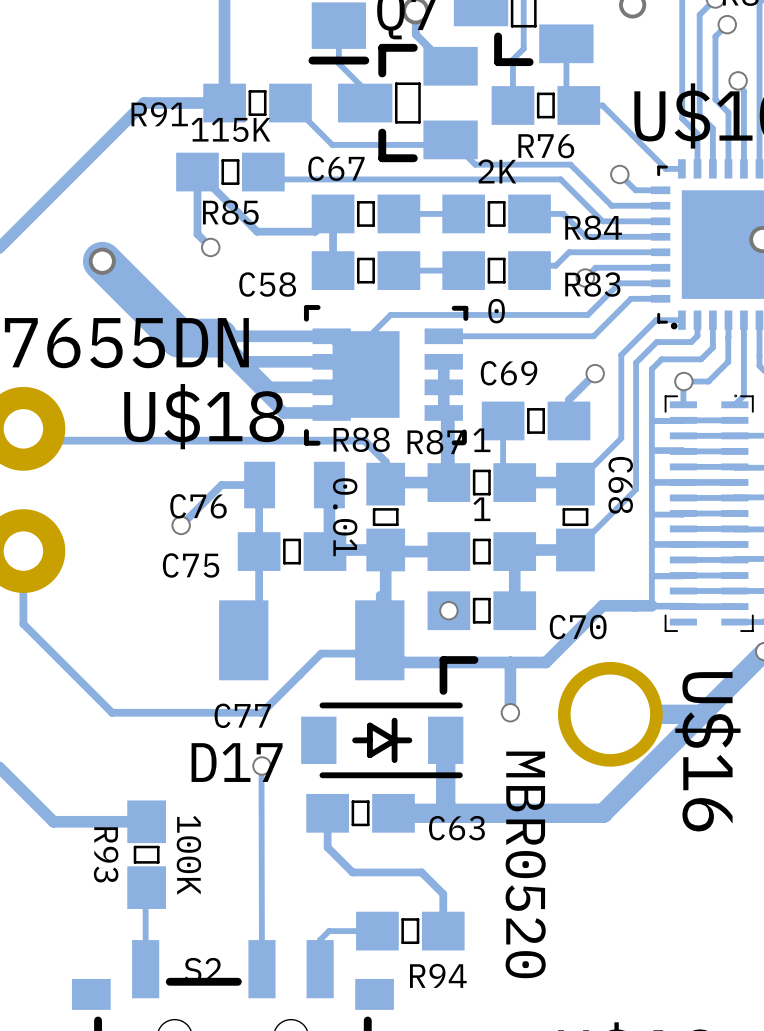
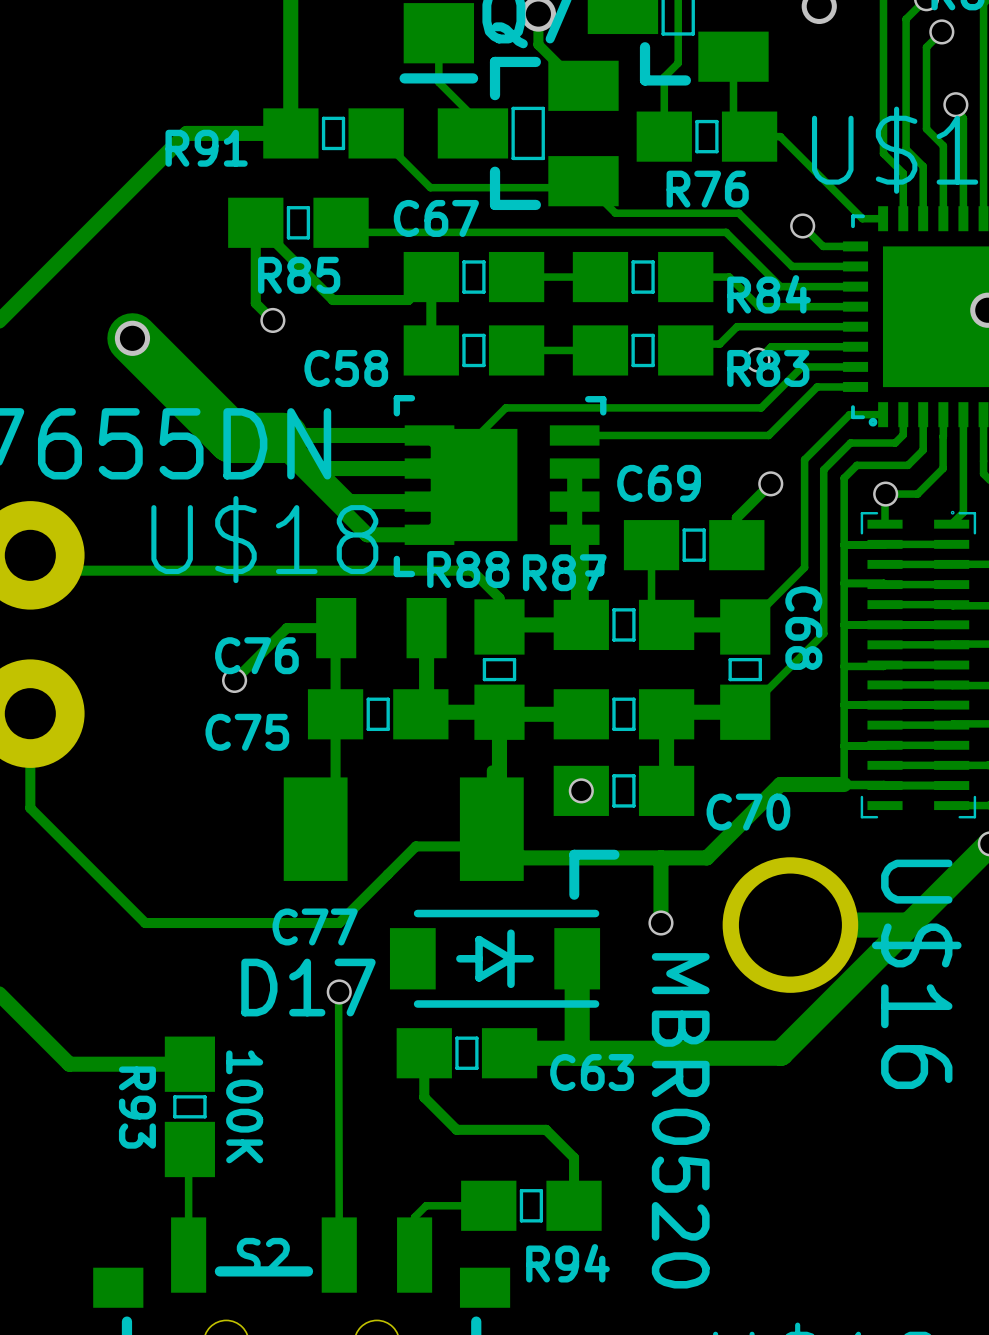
R85 value: 115K (230, 129) -> none
R84 value: 2K (497, 171) -> none
R83 value: 0 (496, 311) -> none
R87 value: 1 (481, 440) -> none
part value: 1 (481, 509) -> none
R88 value: 0.01 (345, 517) -> none

